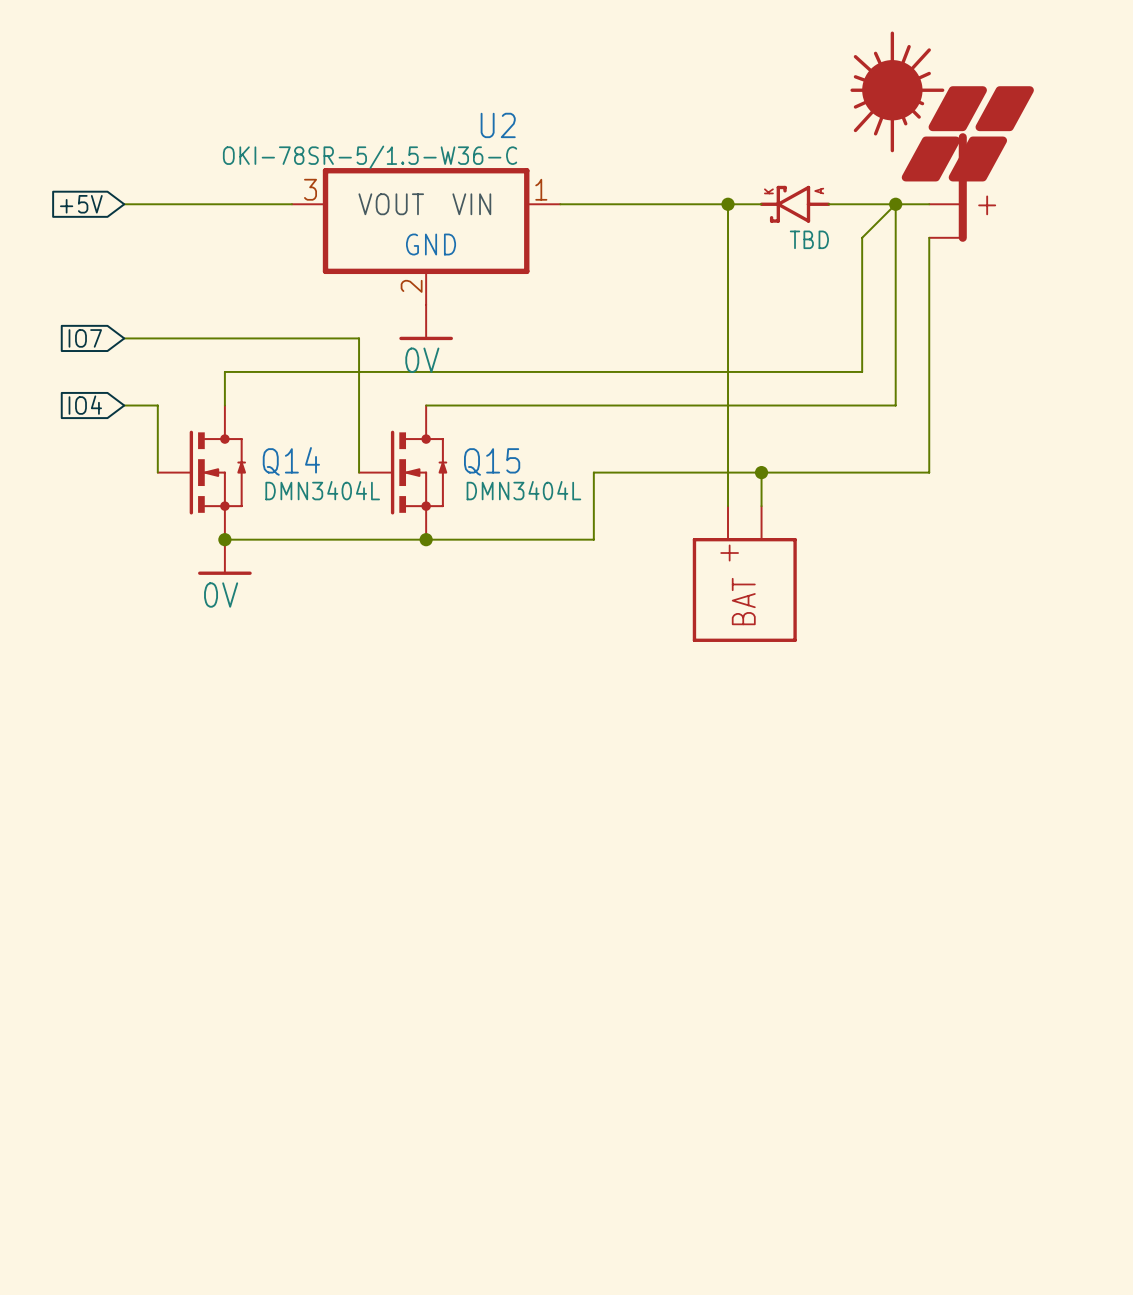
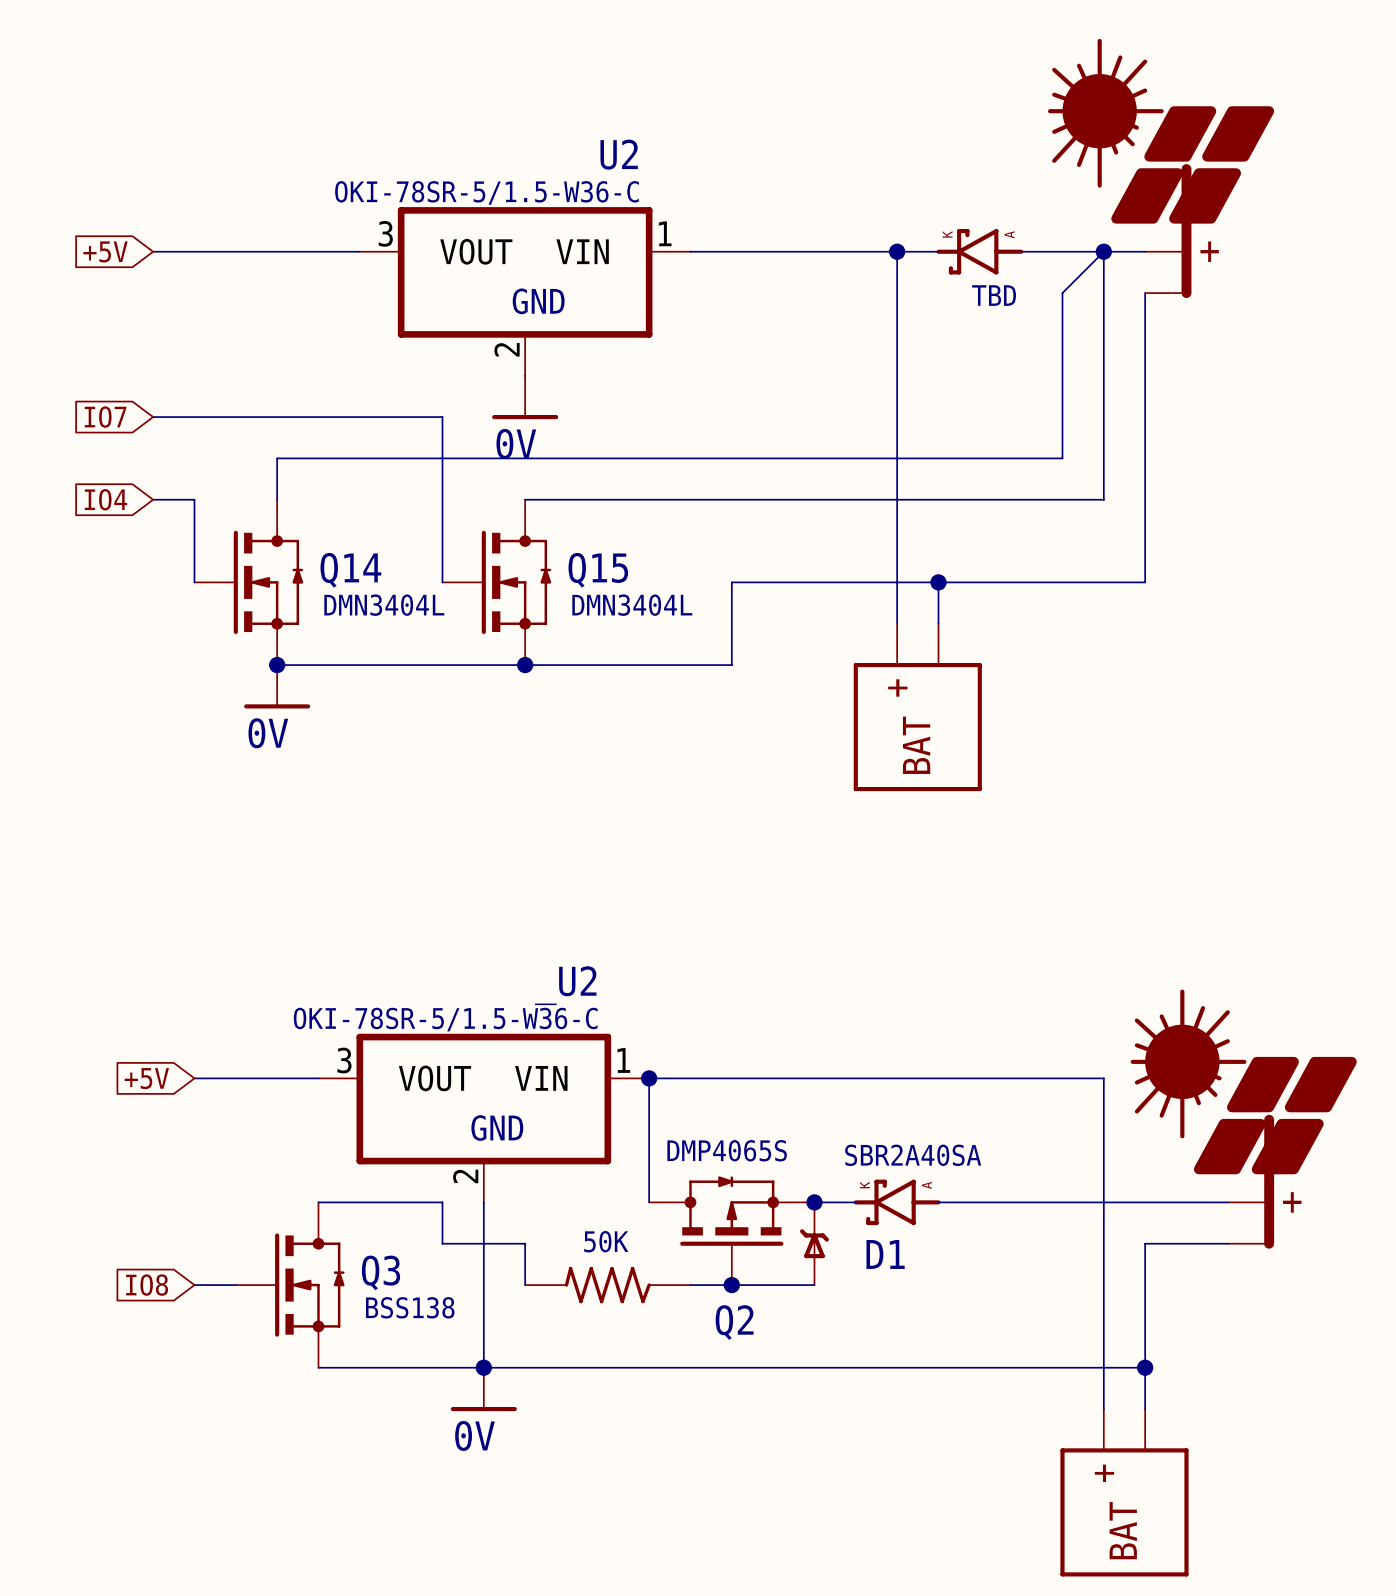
global label: none -> +5V (146, 1078)
wire: none -> (194, 1078) (318, 1078)
junction: none -> (649, 1078)
_U2: none -> OKI-78SR-5/1.5-W36-C (483, 1118)
part: none -> (1243, 1119)
wire: none -> (318, 1202) (442, 1202) (442, 1243) (525, 1243) (525, 1285)
wire: none -> (483, 1202) (483, 1367)
wire: none -> (649, 1202) (649, 1078) (1103, 1078) (1103, 1409)
wire: none -> (814, 1202) (855, 1202)
junction: none -> (814, 1202)
D1: none -> SBR2A40SA (897, 1202)
wire: none -> (938, 1202) (1227, 1202)
Q2: none -> DMP4065S (731, 1230)
part: none -> (814, 1243)
wire: none -> (1227, 1243) (1145, 1243) (1145, 1409)
global label: none -> IO8 (147, 1285)
wire: none -> (194, 1285) (235, 1285)
Q3: none -> BSS138 (290, 1285)
part: none -> 50K (607, 1285)
wire: none -> (690, 1285) (814, 1285)
junction: none -> (731, 1285)
wire: none -> (318, 1367) (1145, 1367)
junction: none -> (483, 1367)
junction: none -> (1145, 1367)
power symbol: none -> 0V (483, 1389)
part: none -> (1124, 1492)

